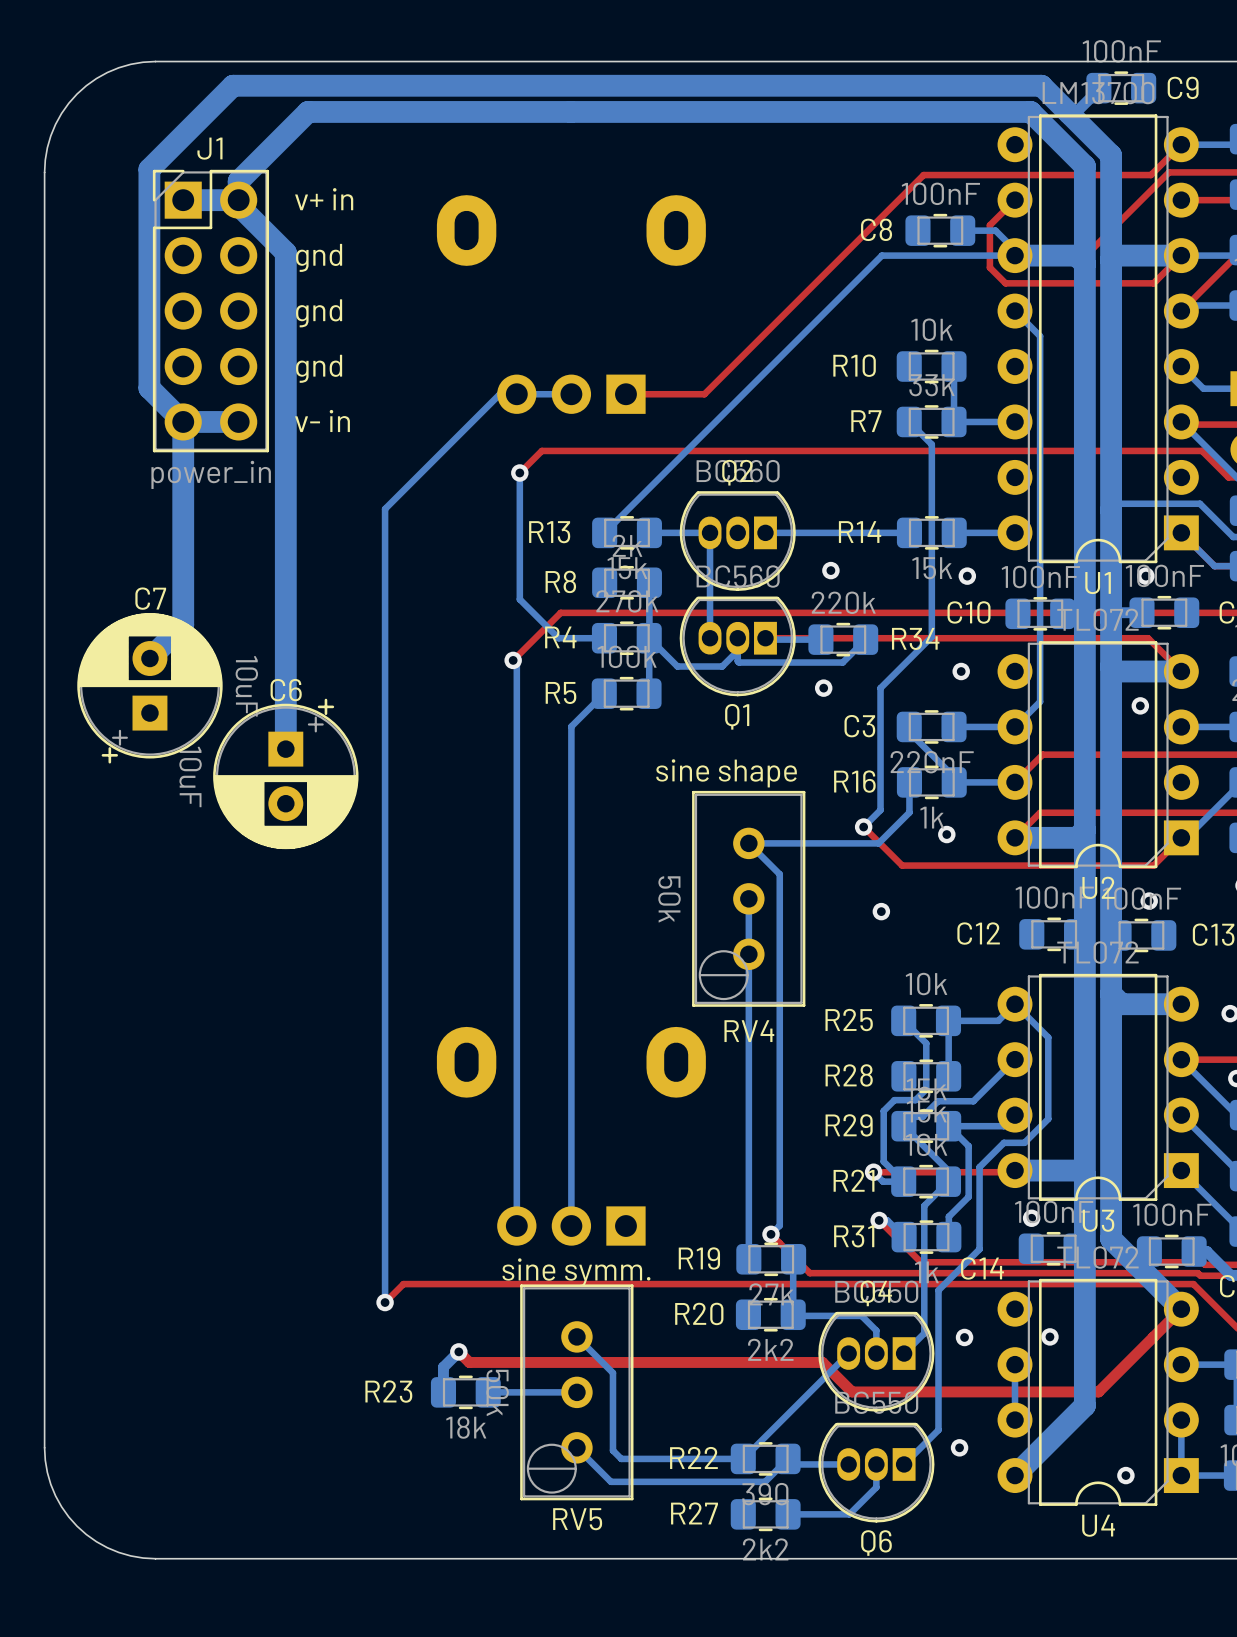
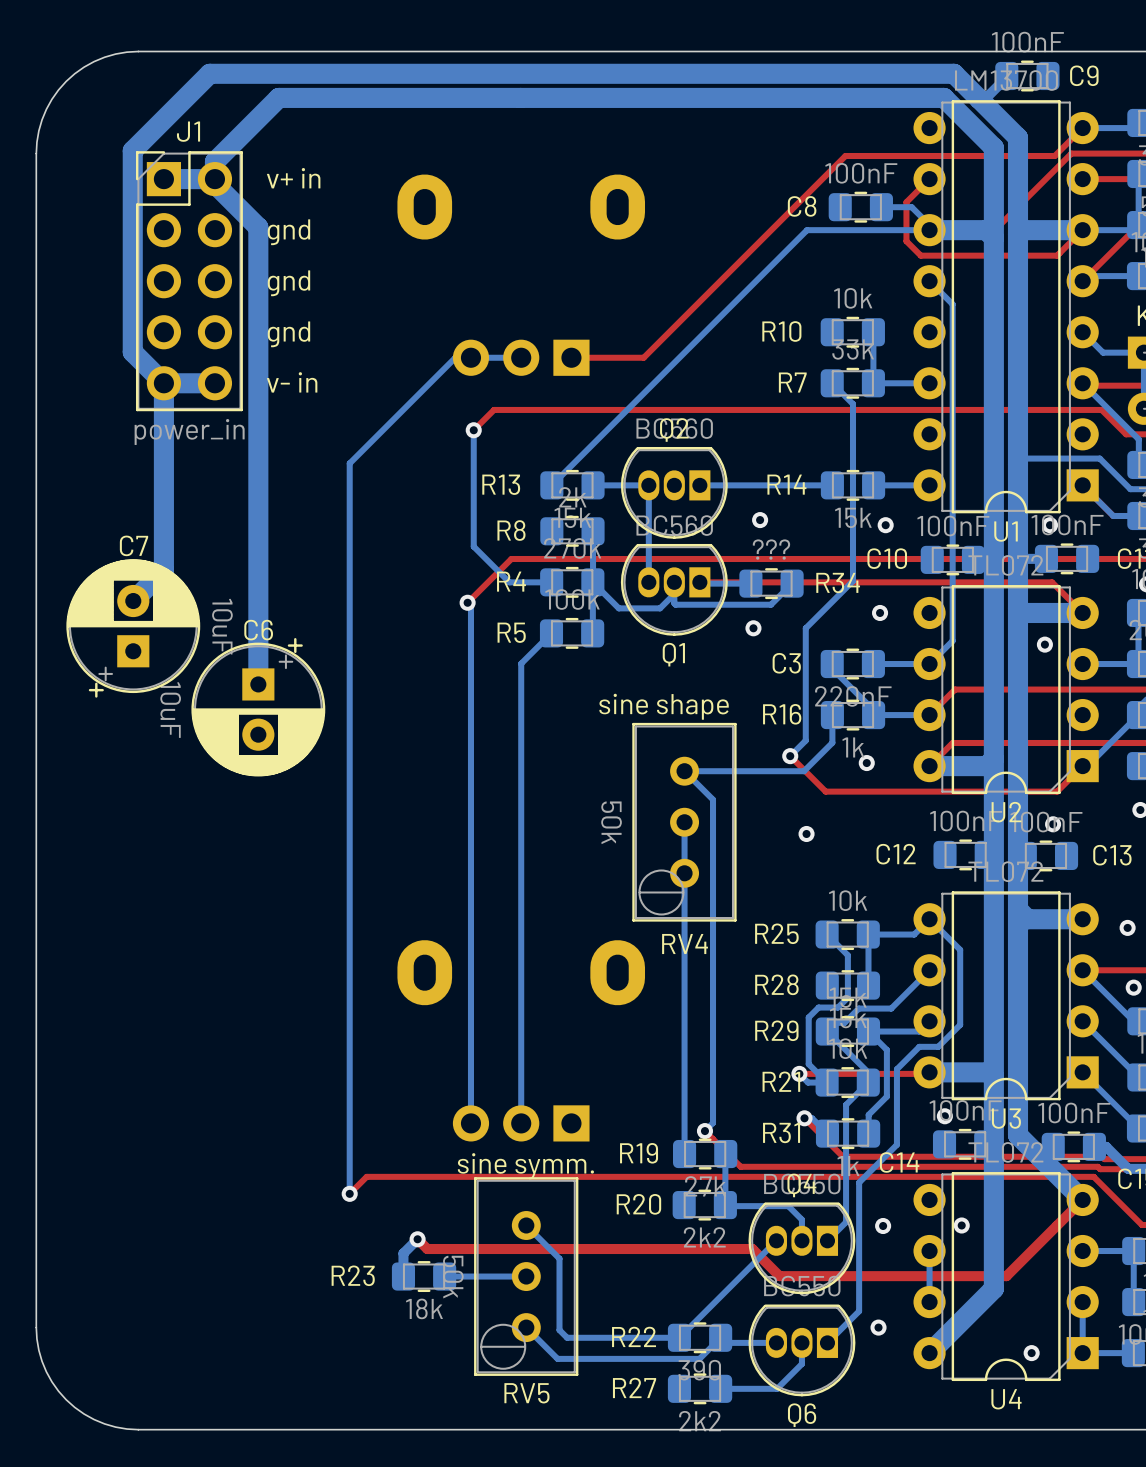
R34 value: 220k (843, 602) -> ??? (771, 549)

